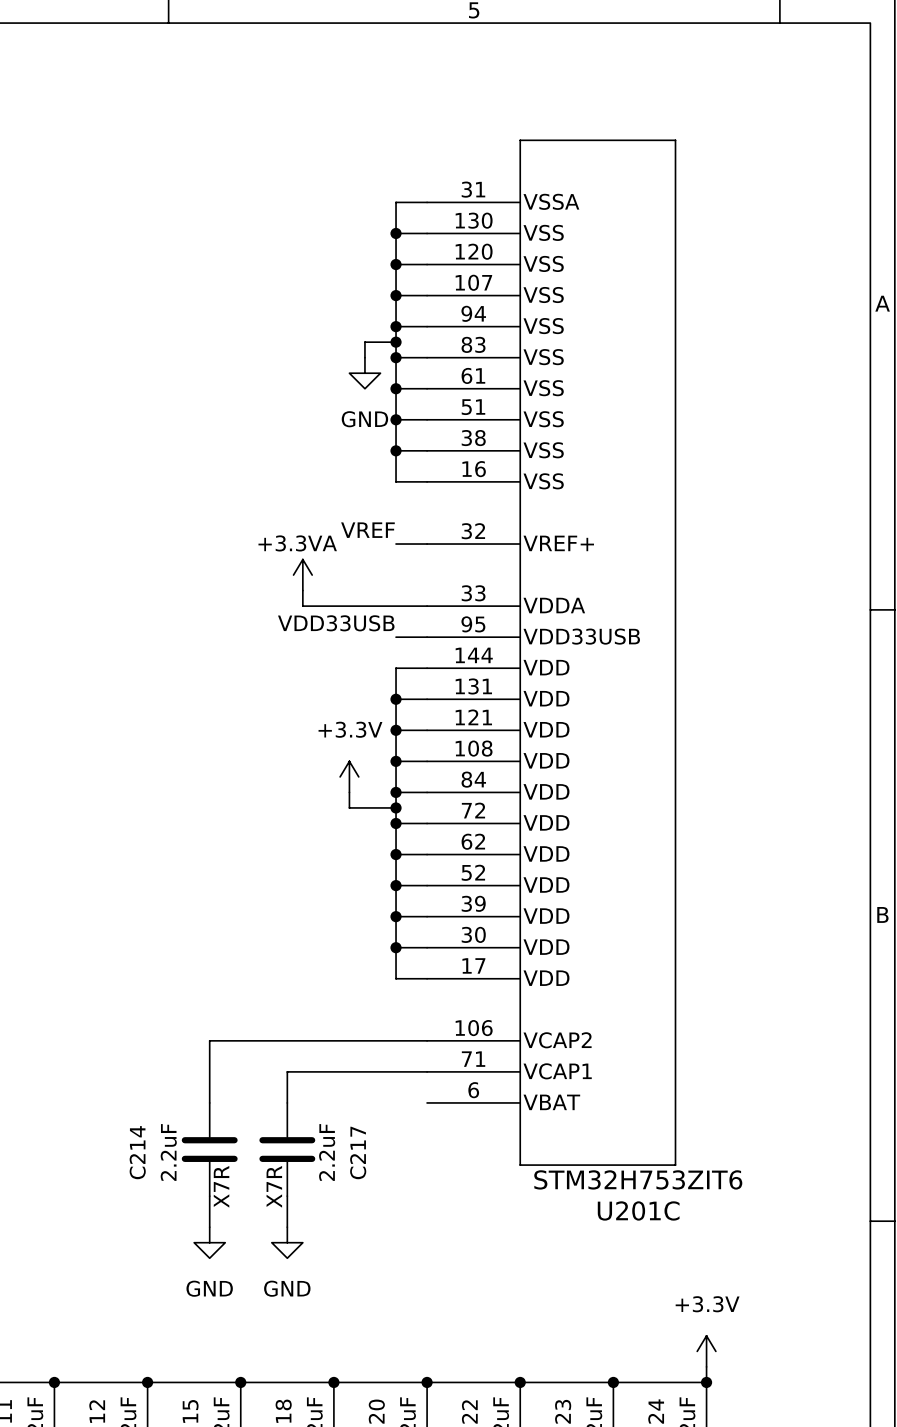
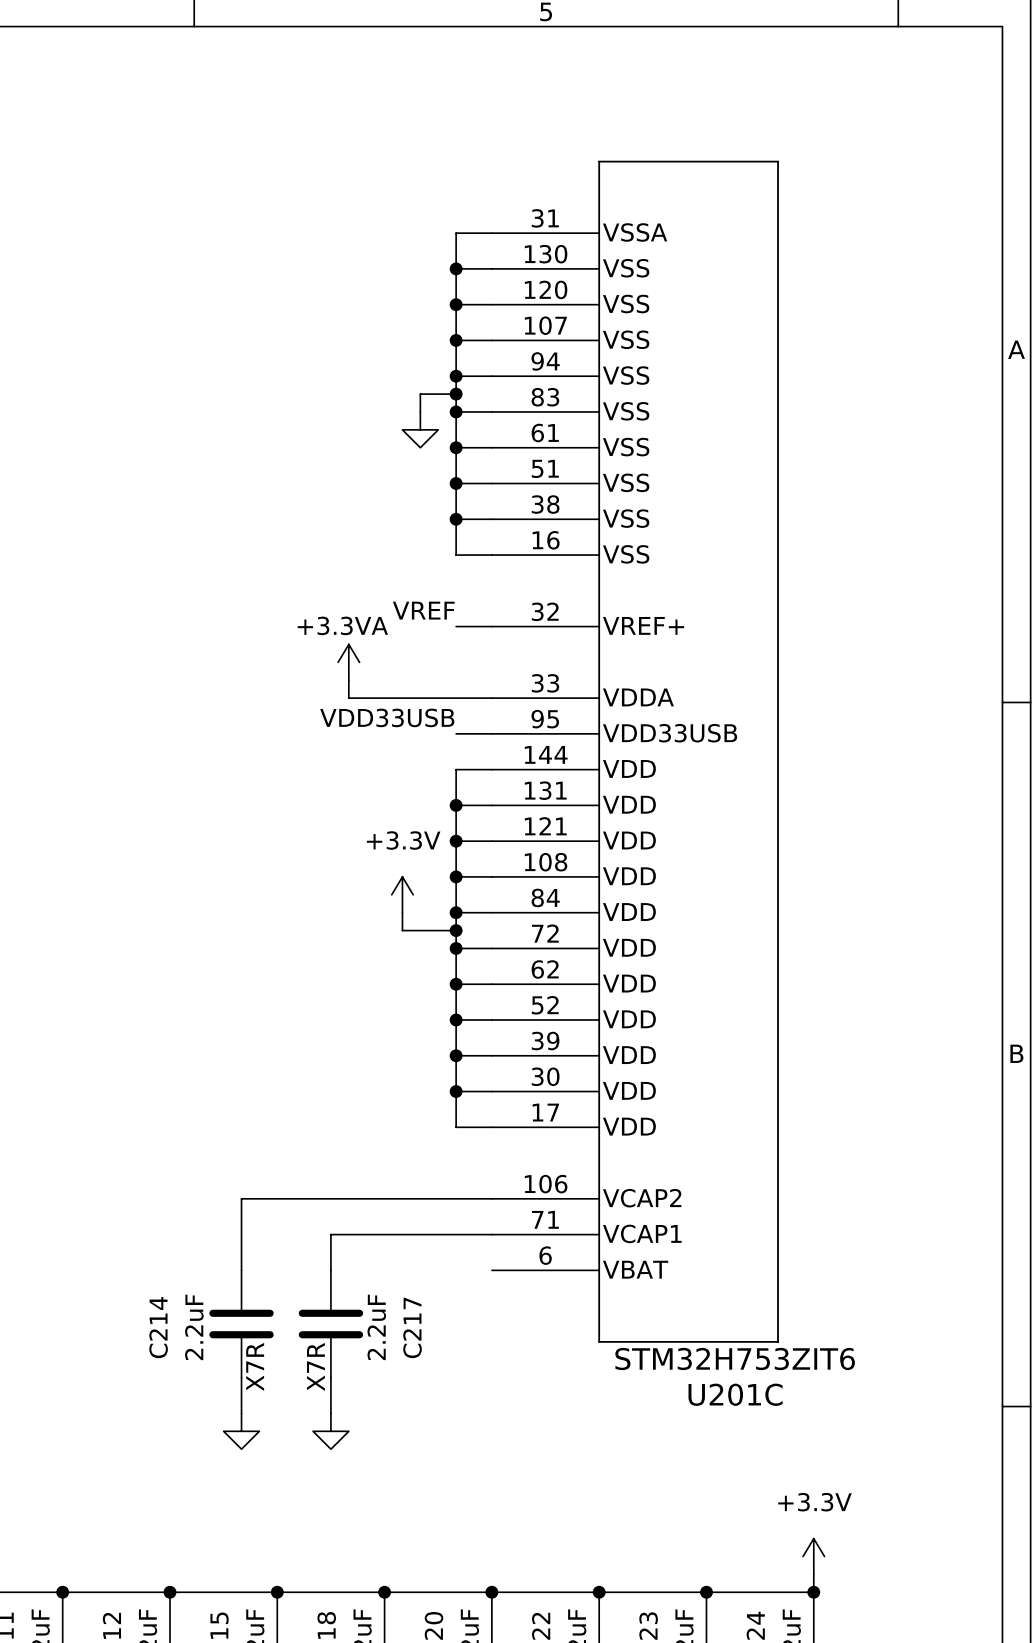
power symbol text: GND (364, 419) -> none
power symbol text: GND (209, 1288) -> none
power symbol text: GND (287, 1288) -> none

